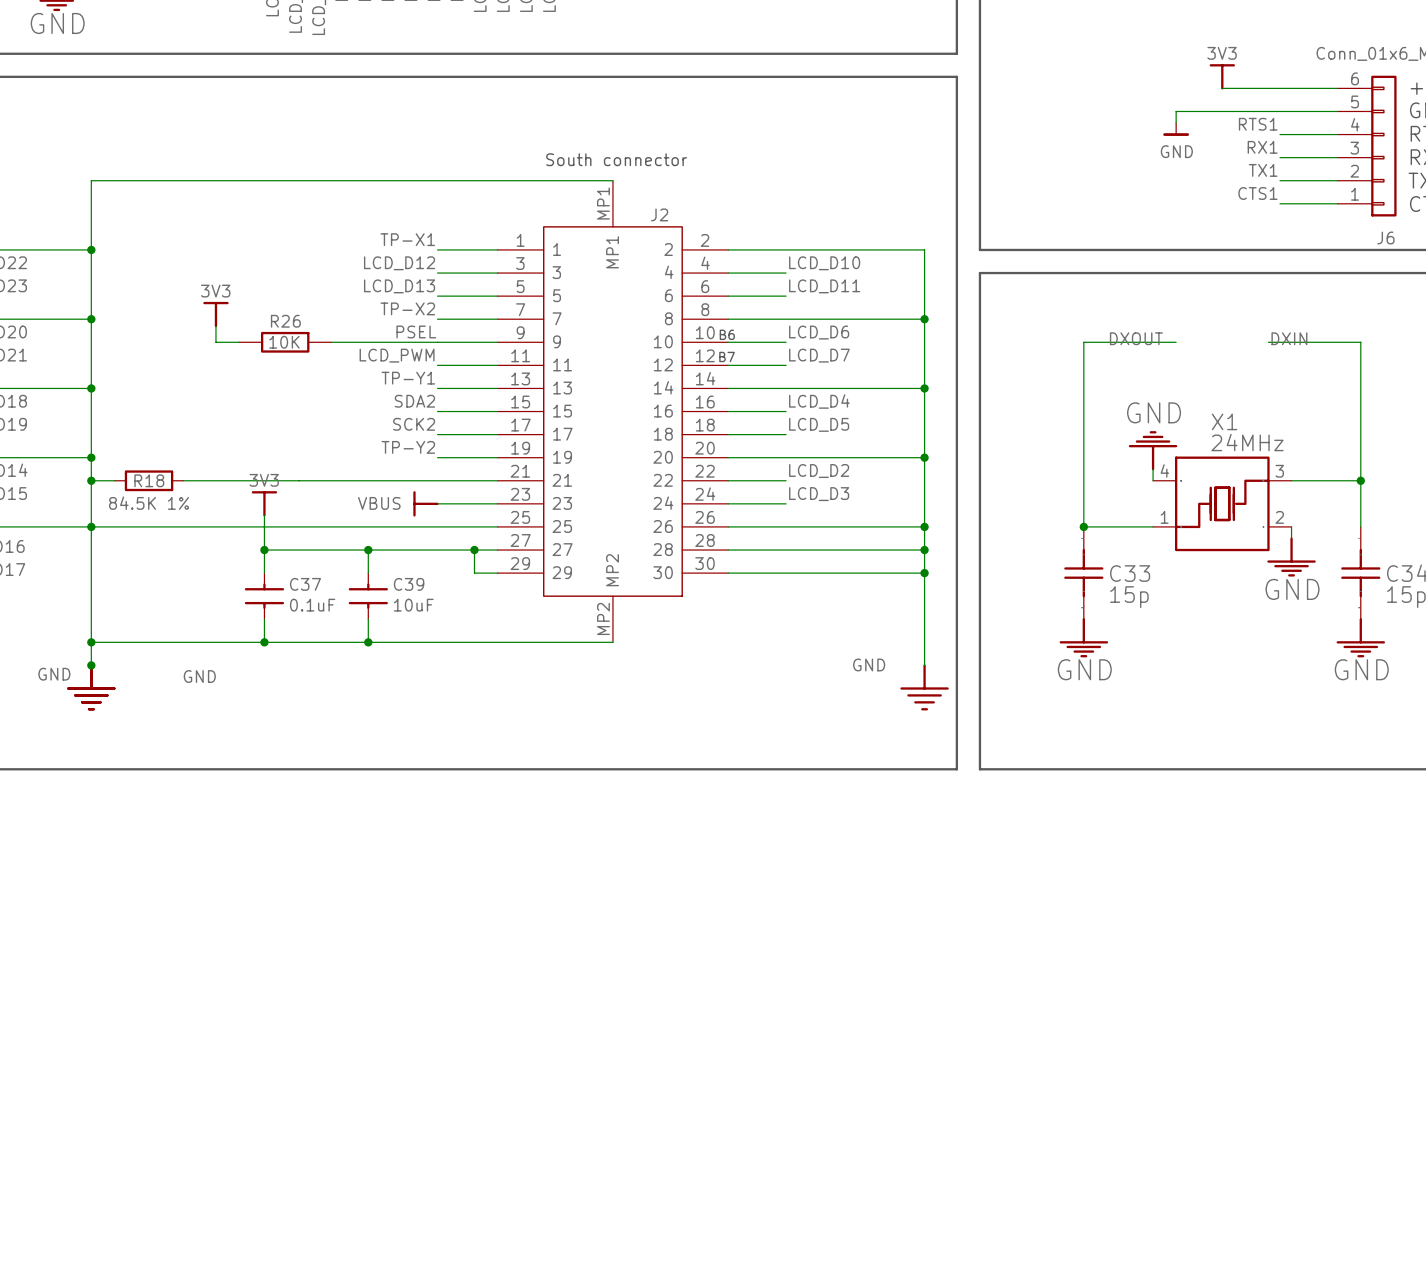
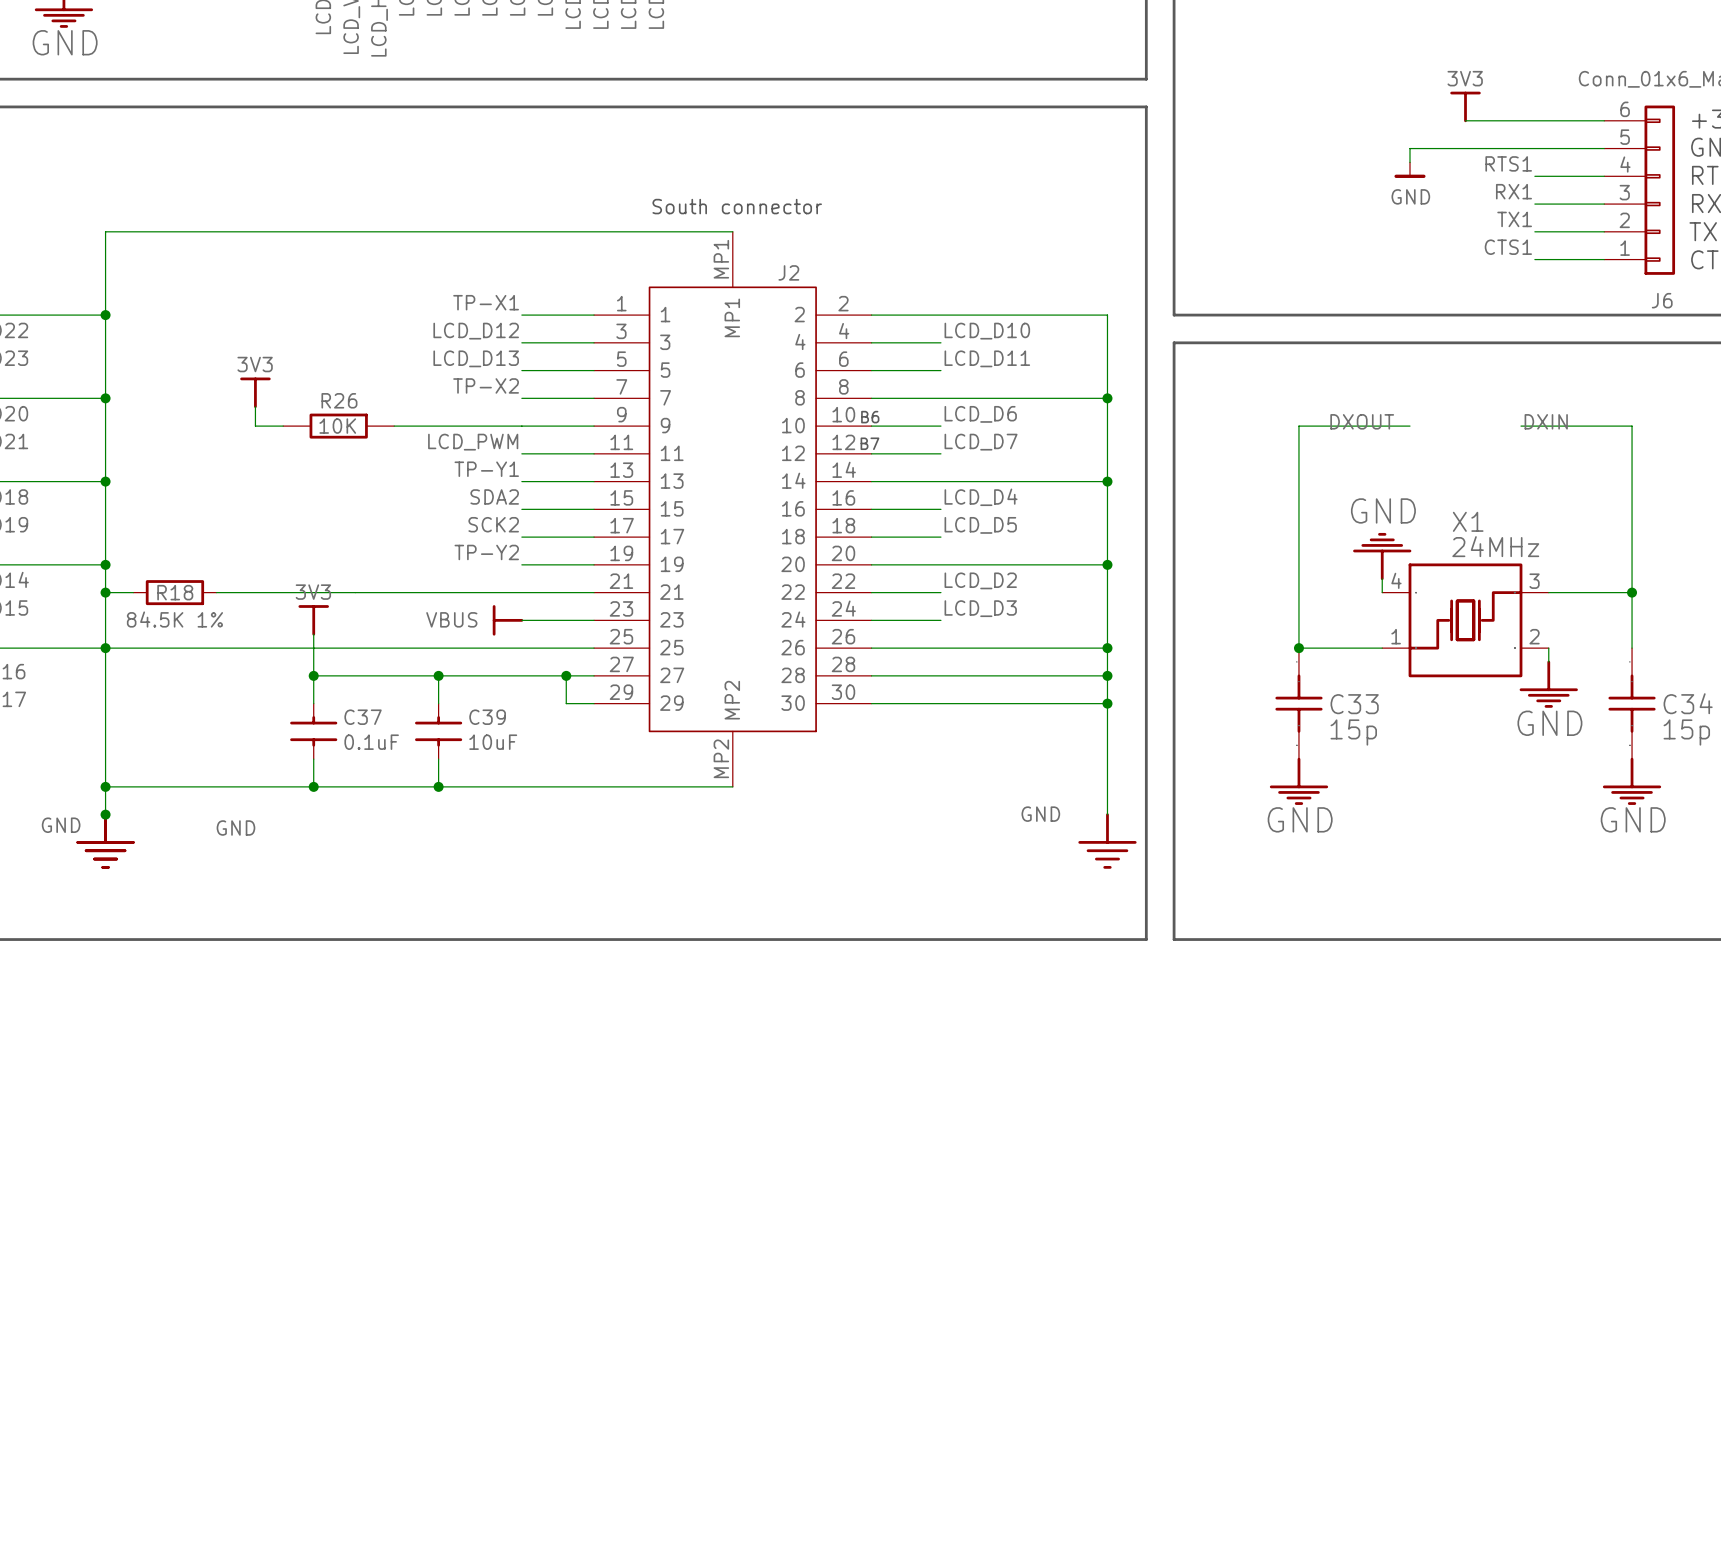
label: PSEL (416, 331) -> none

